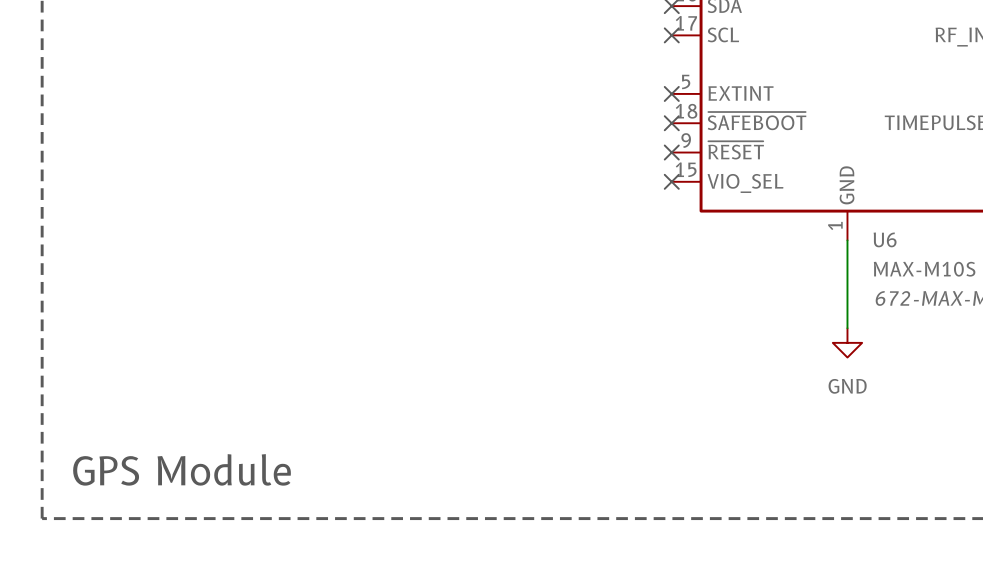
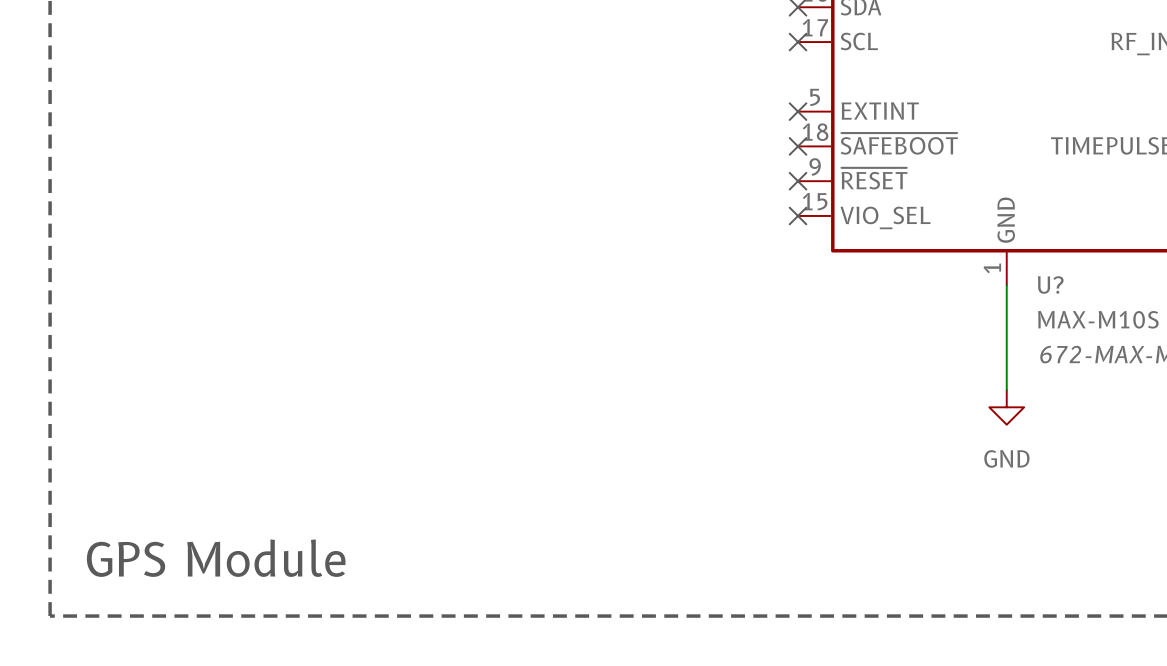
U6 name: U6 (885, 239) -> U? (1050, 285)

